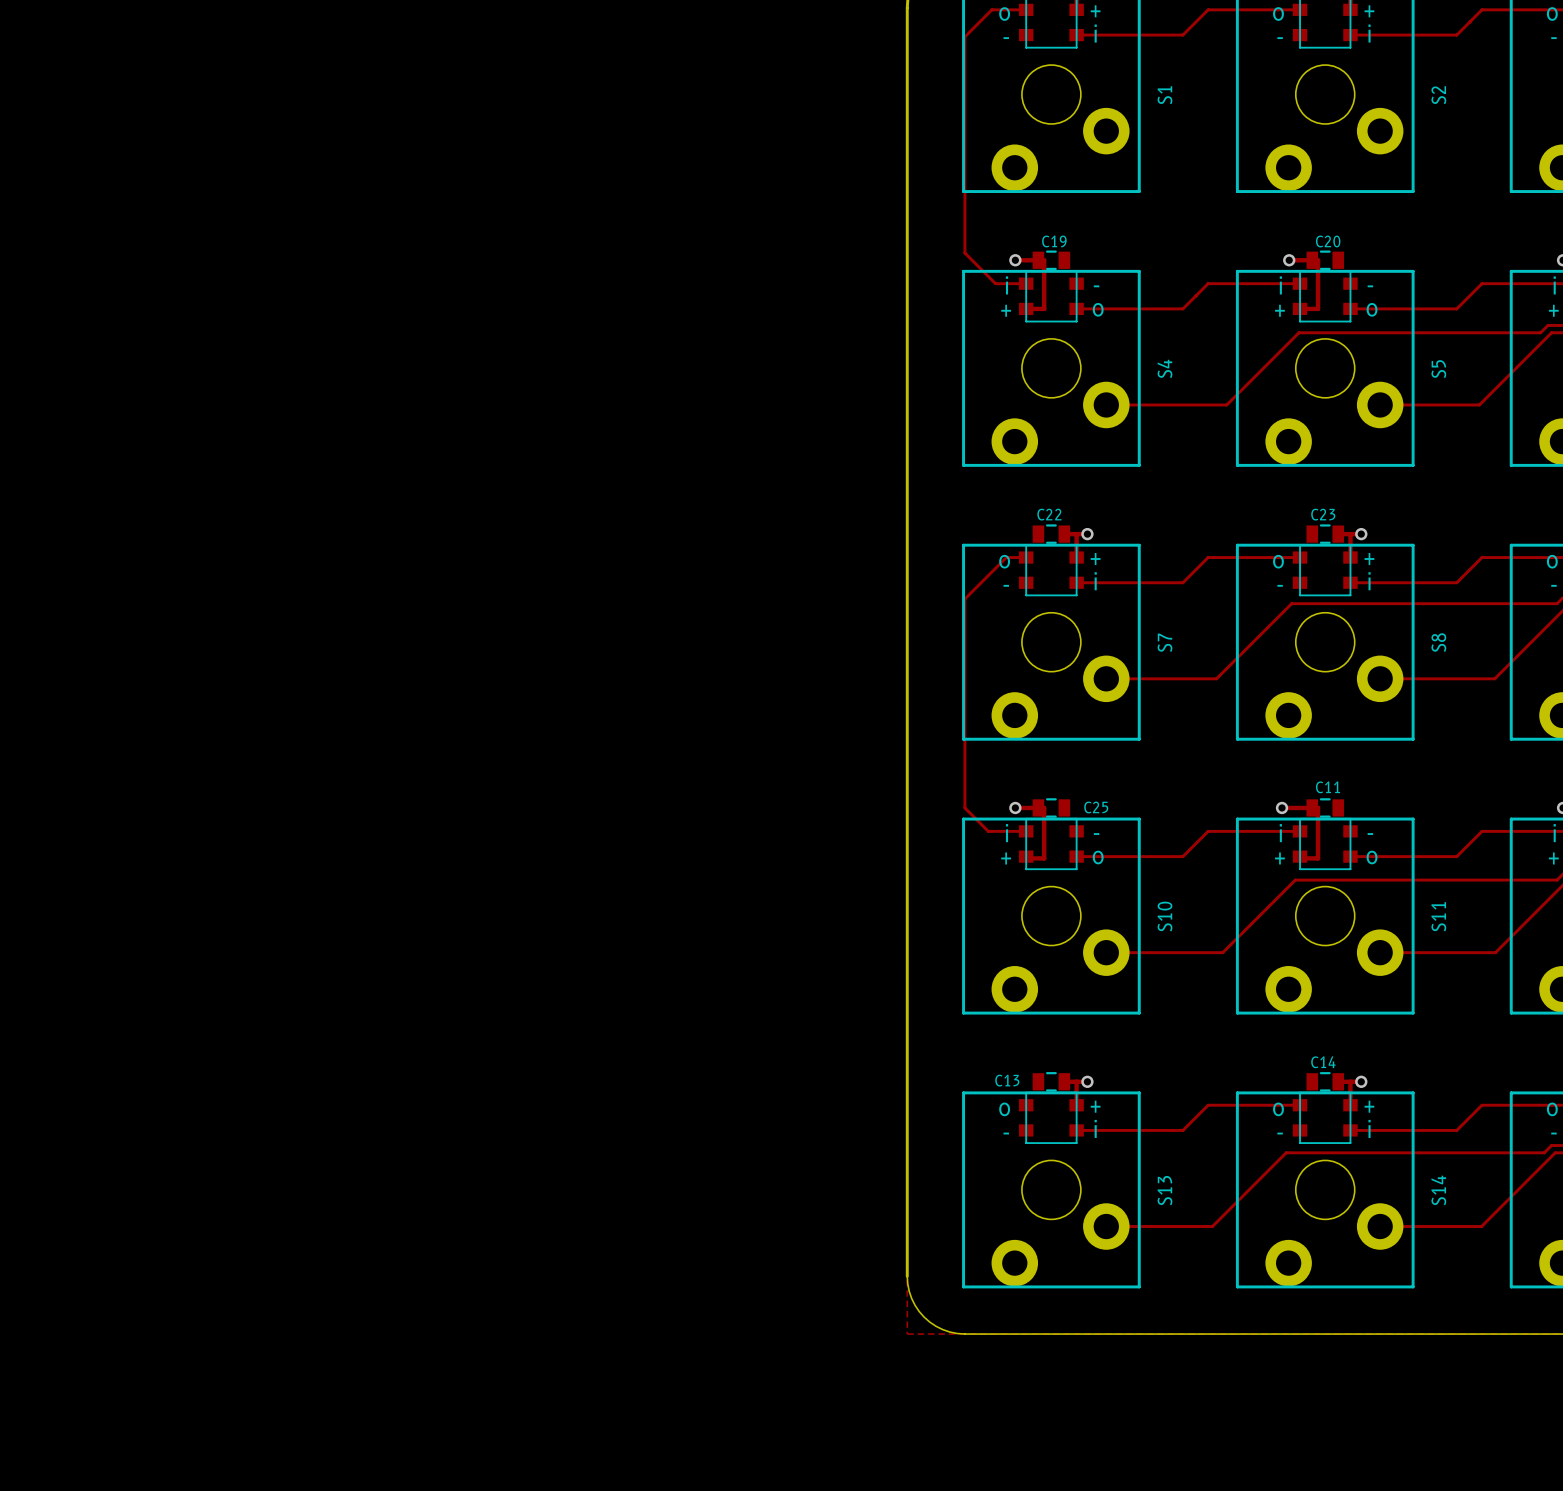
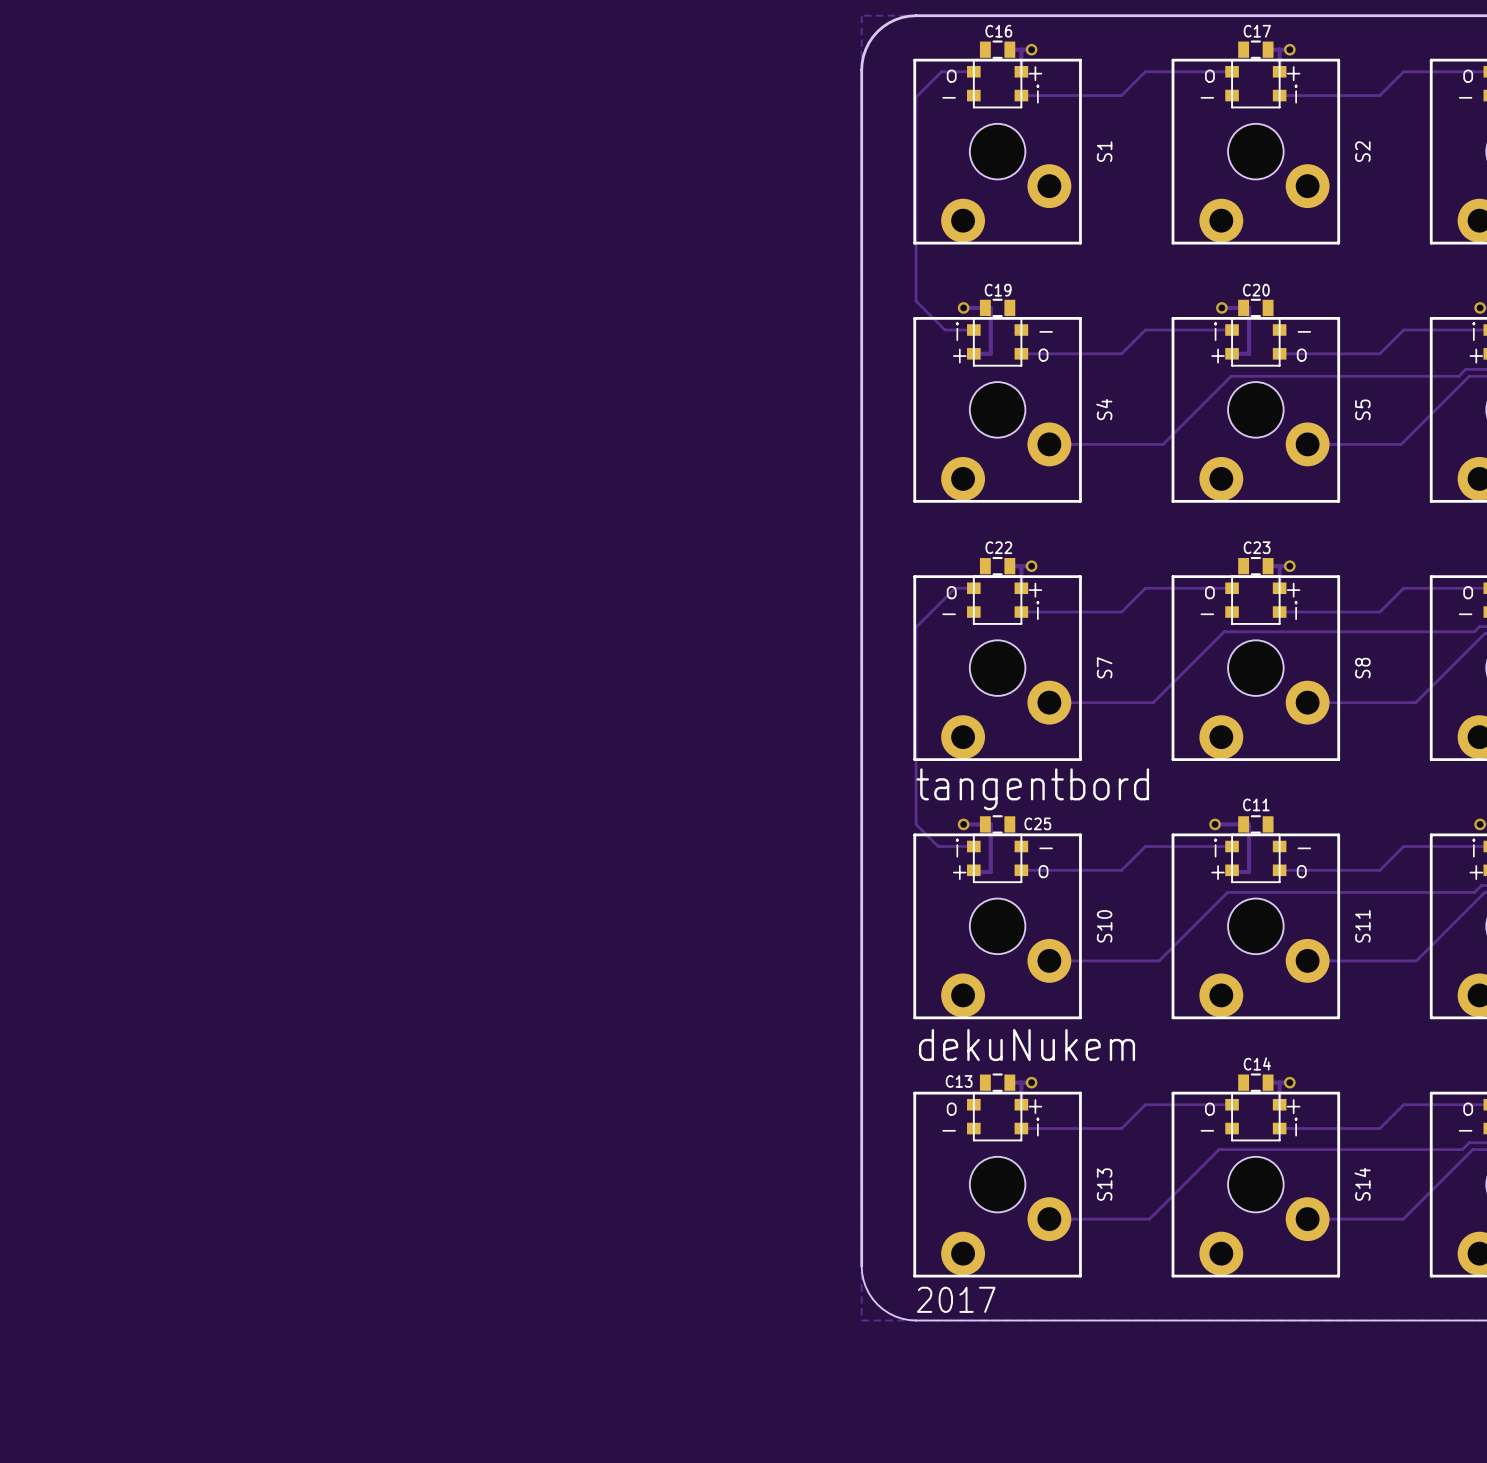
text: none -> tangentbord (1032, 789)
text: none -> dekuNukem (1027, 1045)
text: none -> 2017 (956, 1299)

